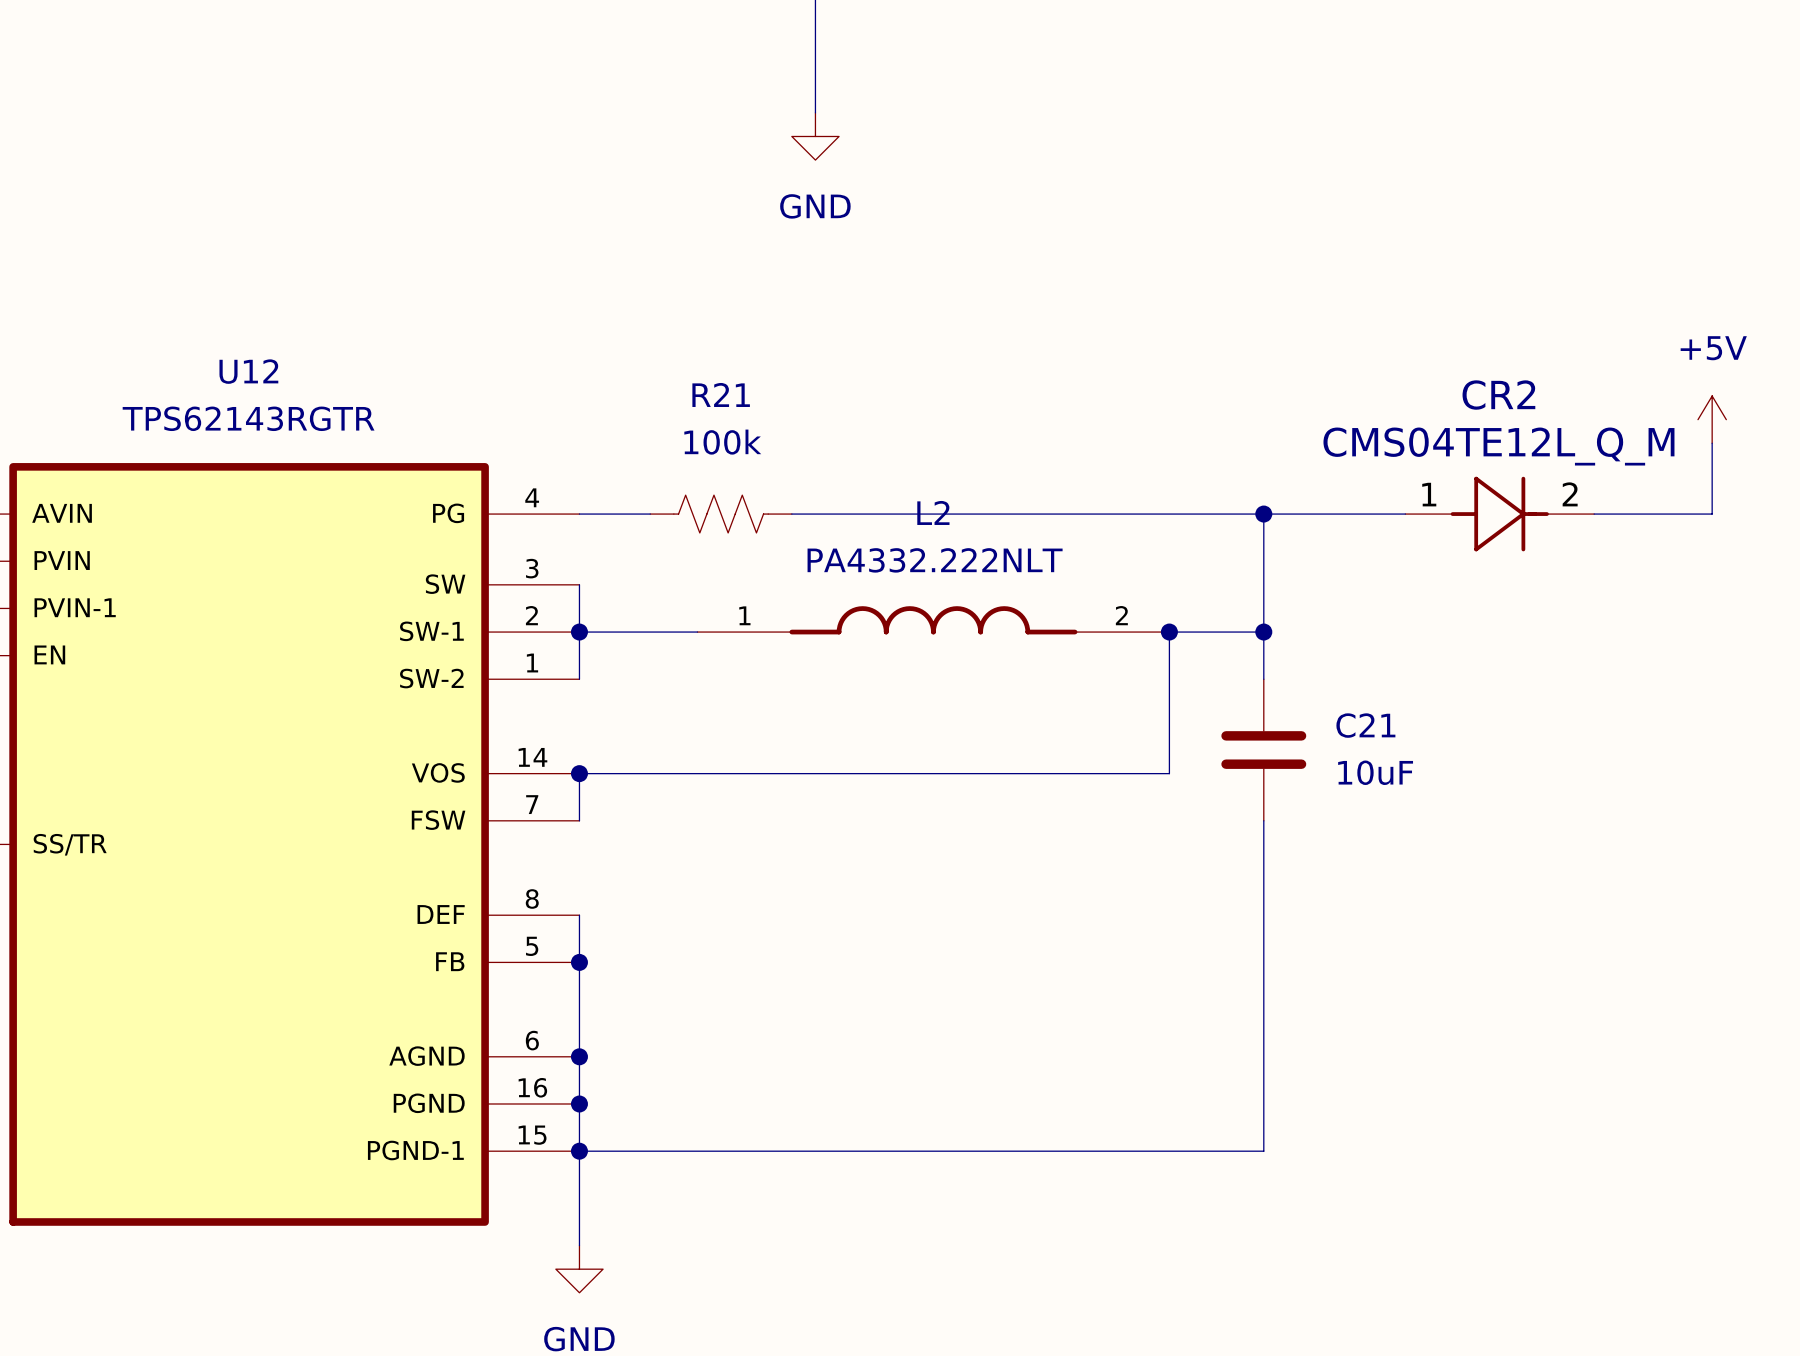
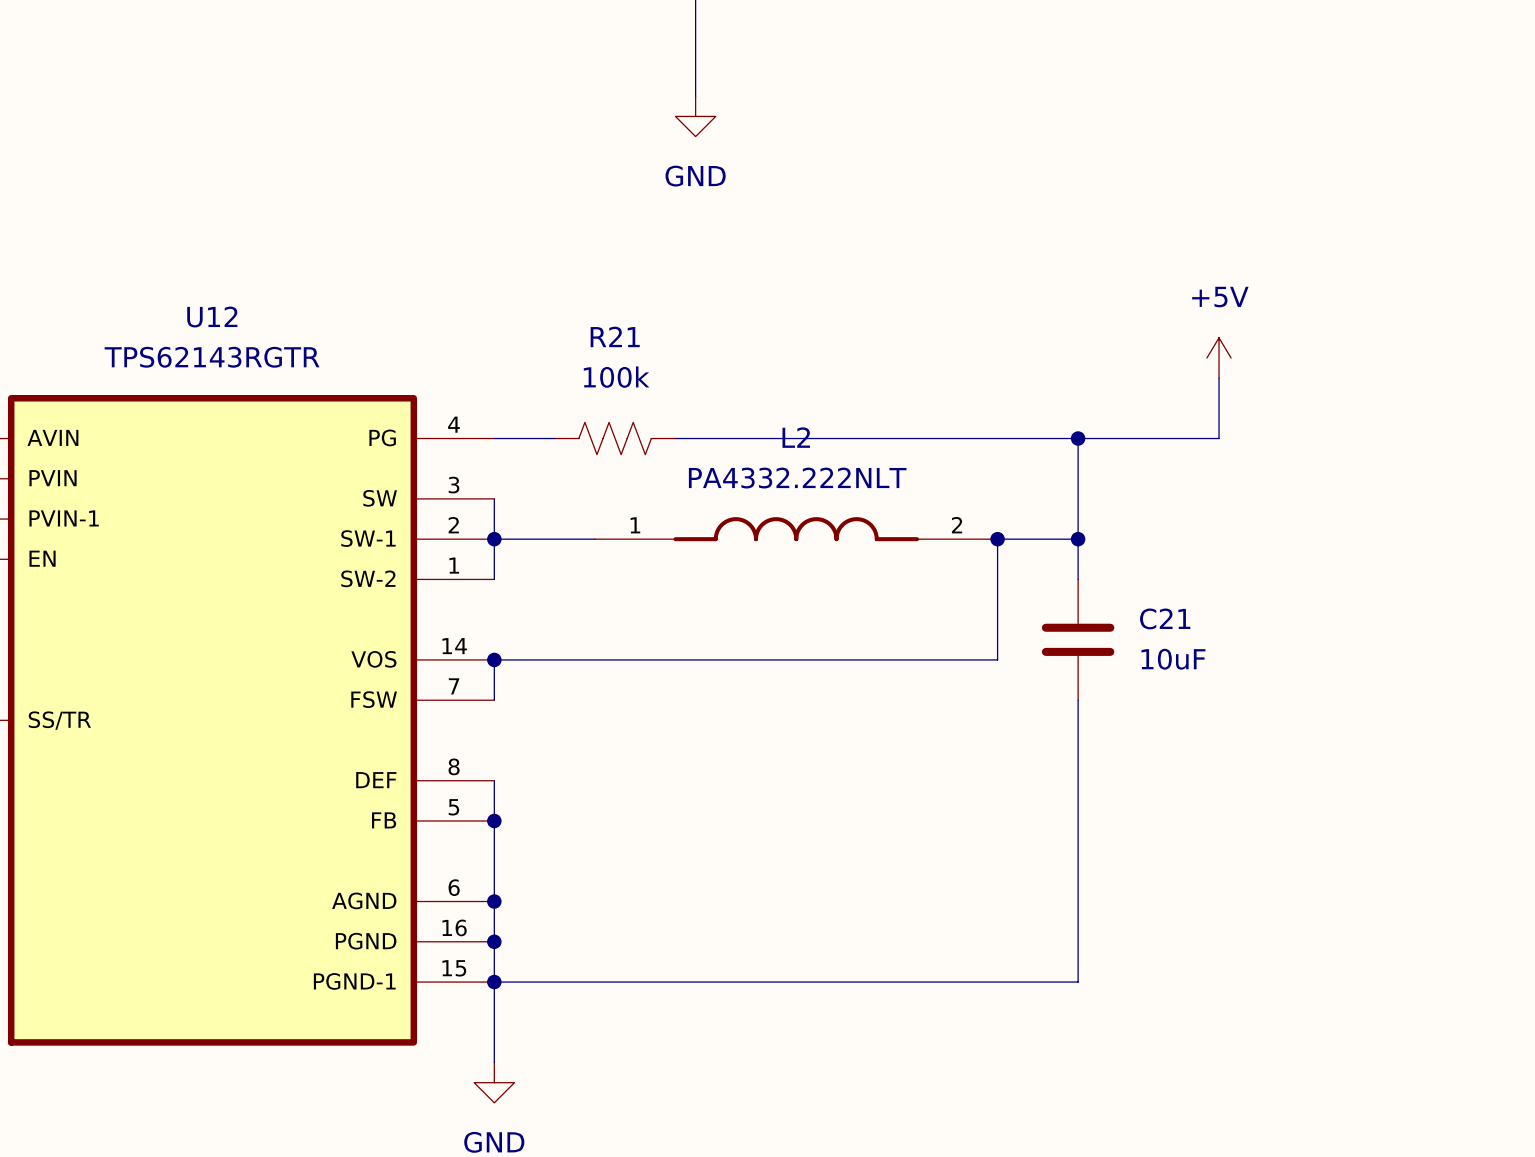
power symbol position: +5V (1712, 419) -> +5V (1219, 357)
wire: none -> (1219, 378) (1219, 438) (1198, 438)
wire: (1712, 443) (1712, 514) (1594, 514) -> none
CR2: CMS04TE12L_Q_M (1499, 514) -> none

